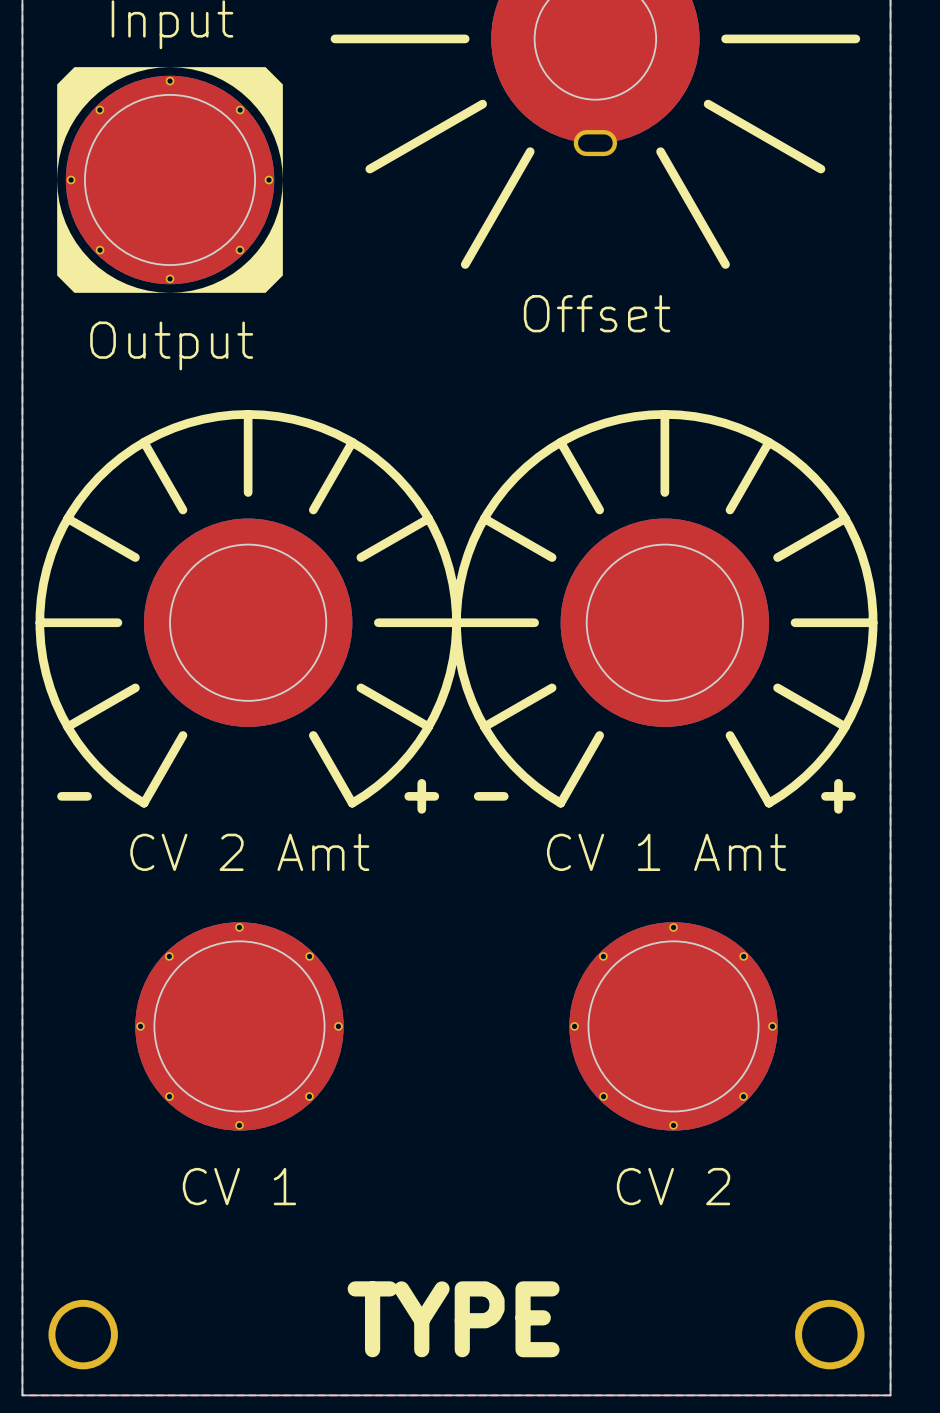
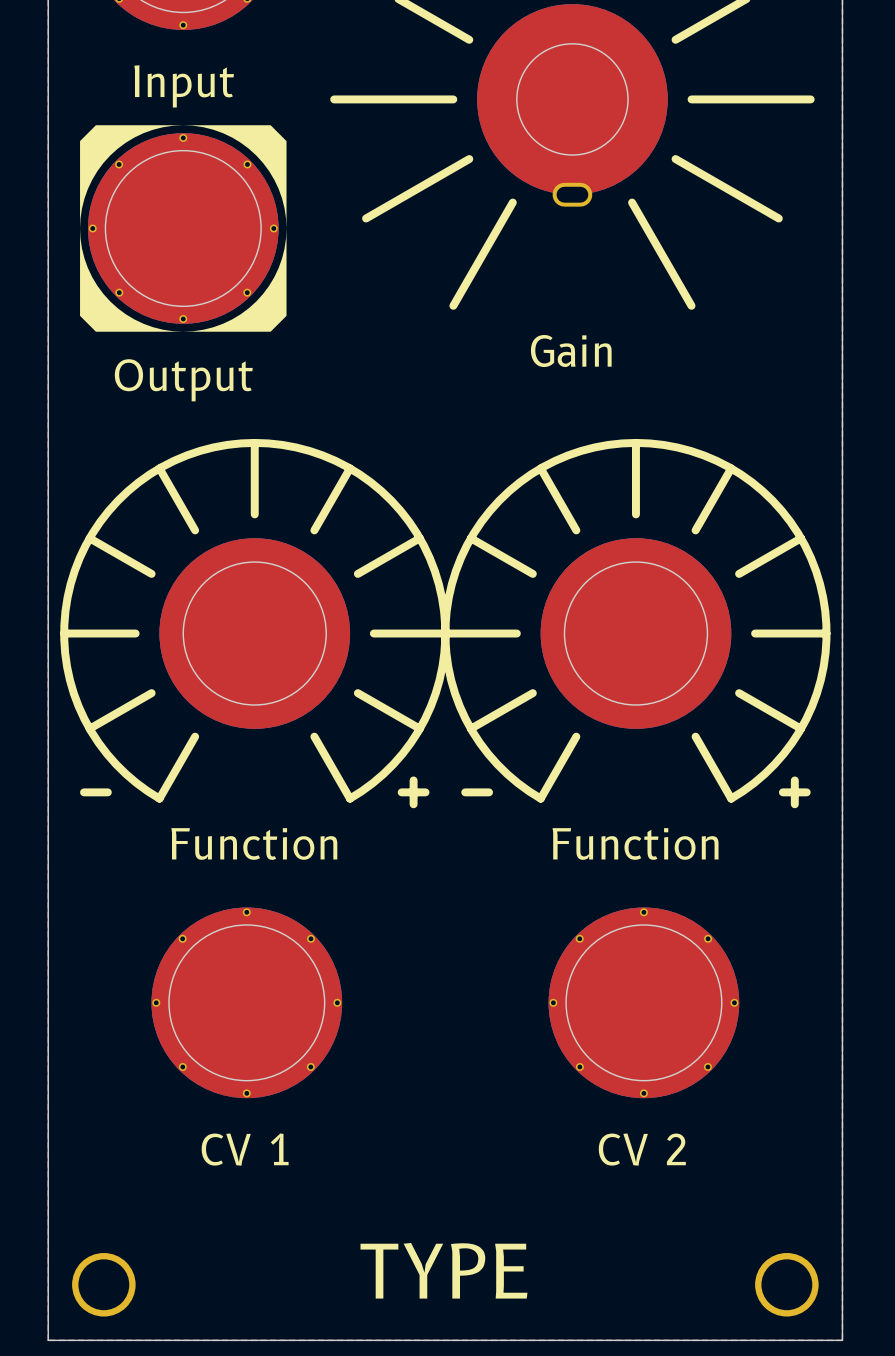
part value: Offset (597, 313) -> Gain (571, 351)
part value: CV 2 Amt (249, 852) -> Function (254, 843)
part value: CV 1 Amt (666, 852) -> Function (635, 843)

